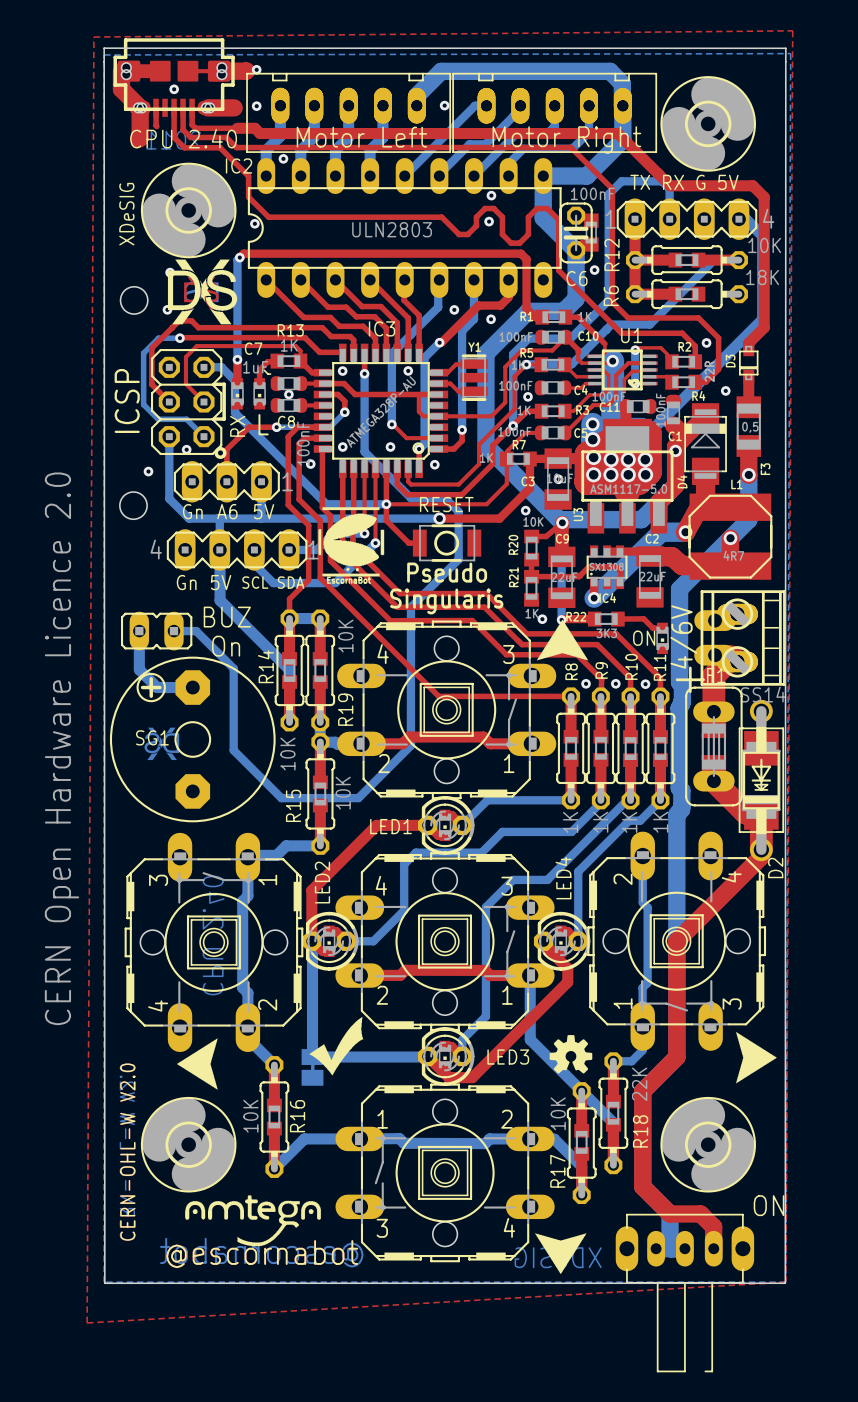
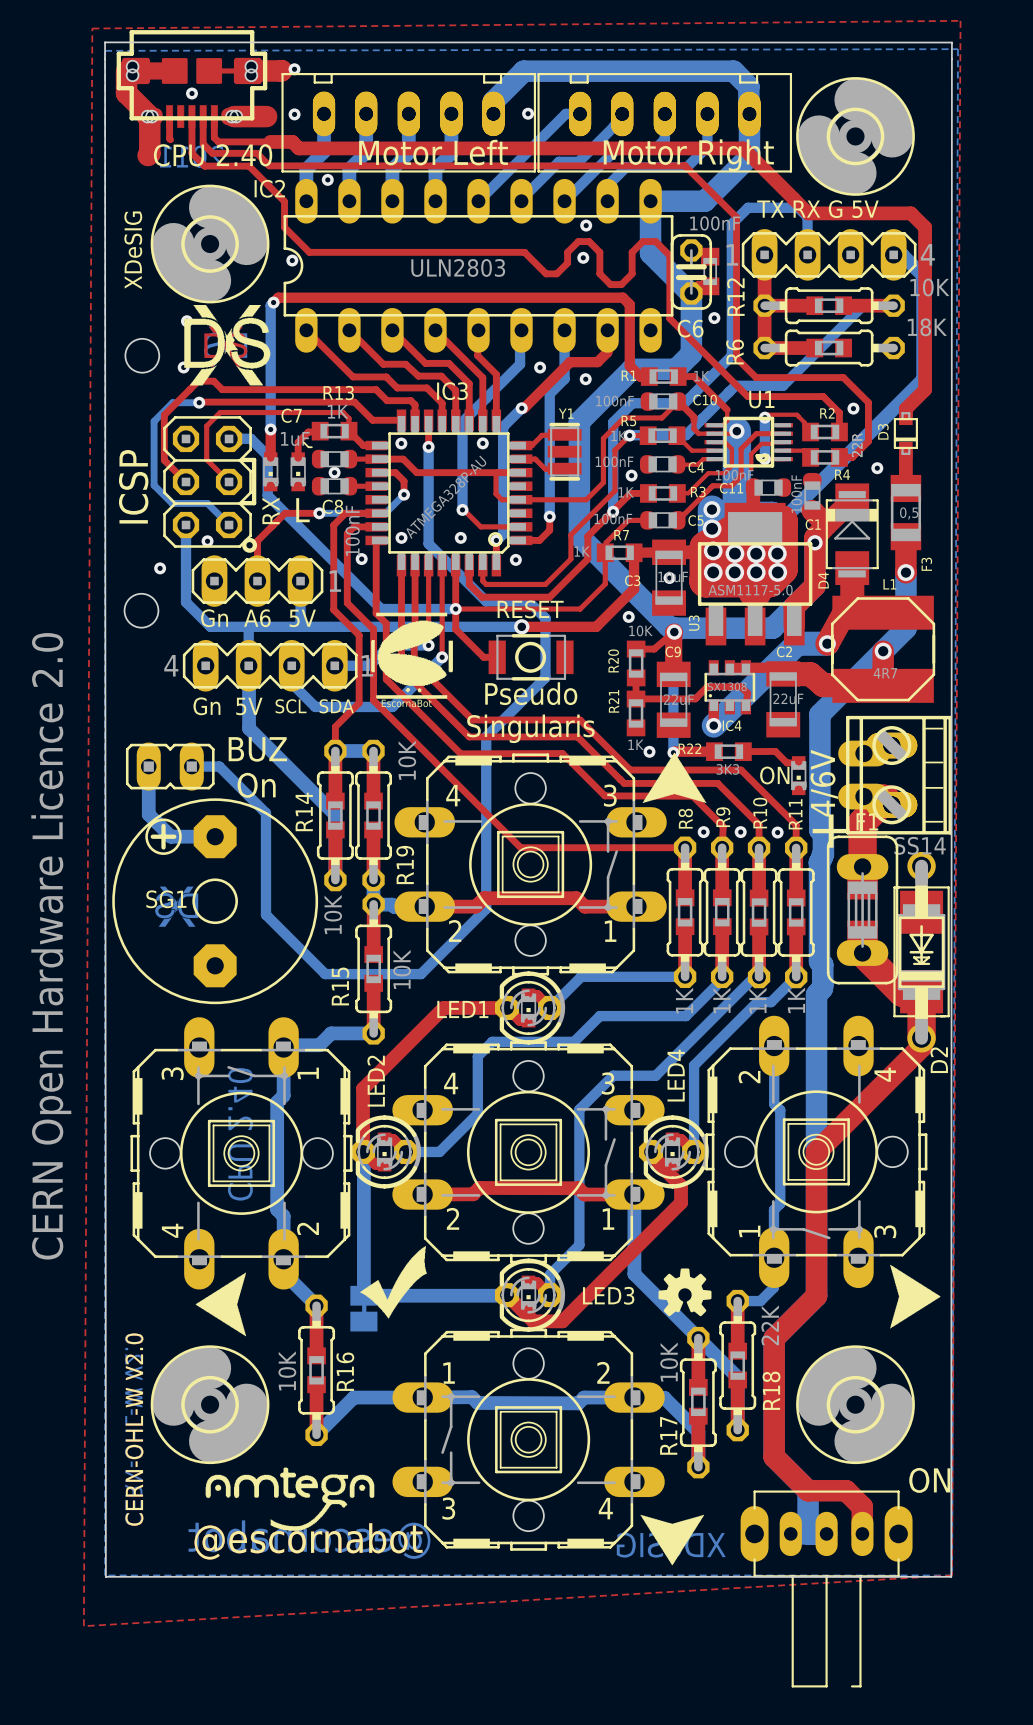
R19 value position: 10K (345, 636) -> 10K (333, 914)
R14 name: R14 (265, 666) -> R19 (405, 865)
R19 name: R19 (345, 709) -> R14 (304, 811)
R14 value position: 10K (287, 754) -> 10K (407, 760)

